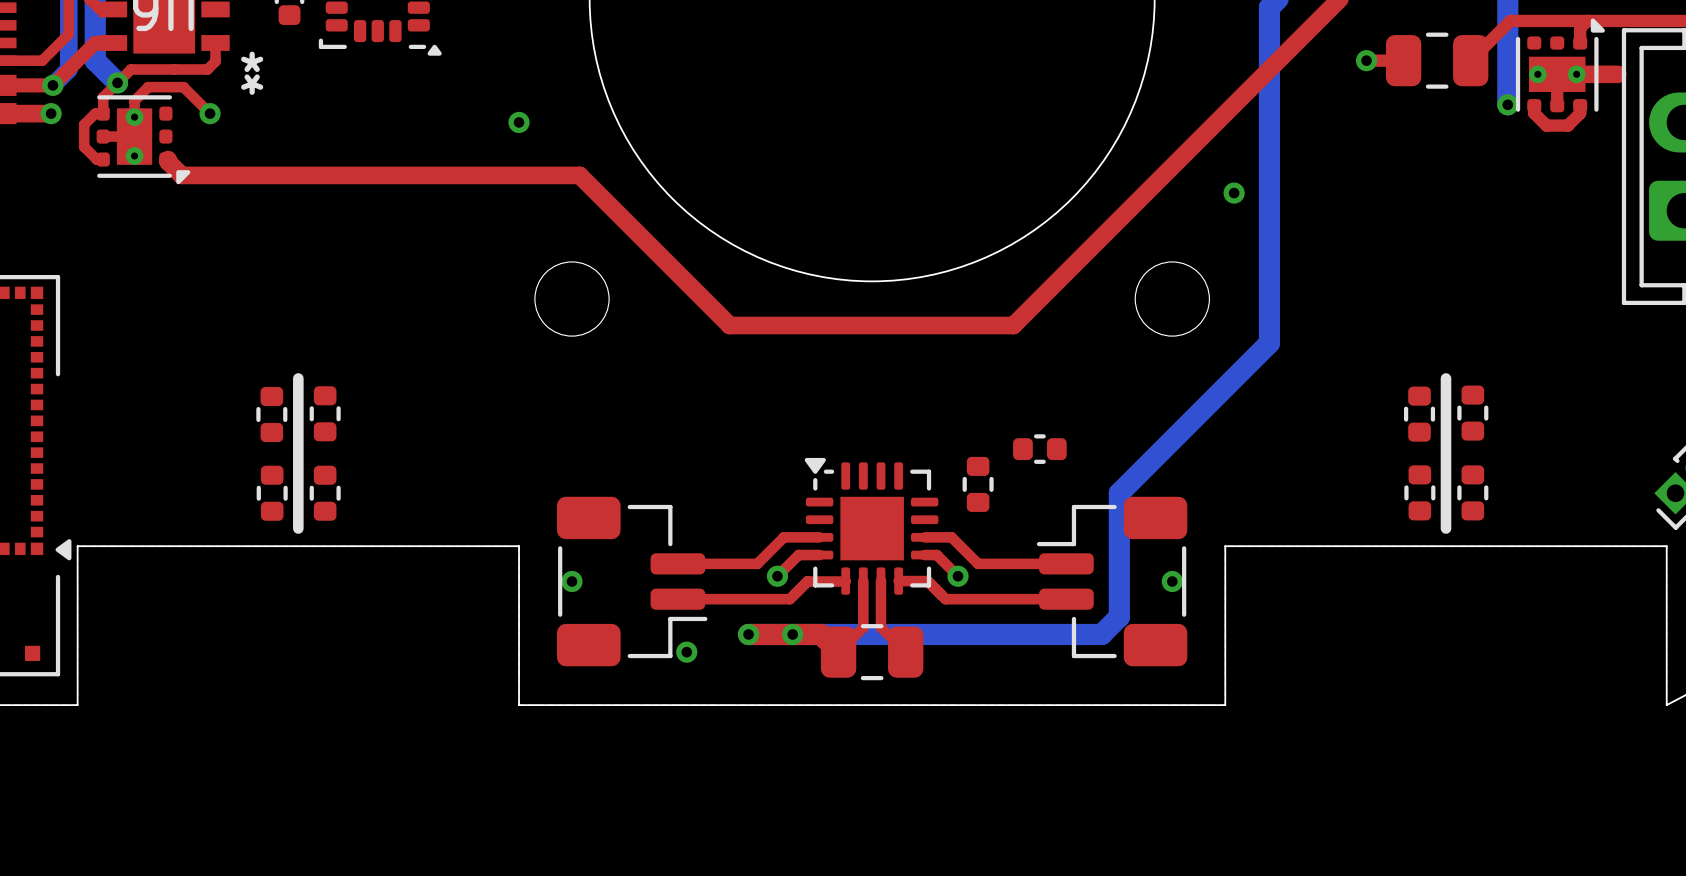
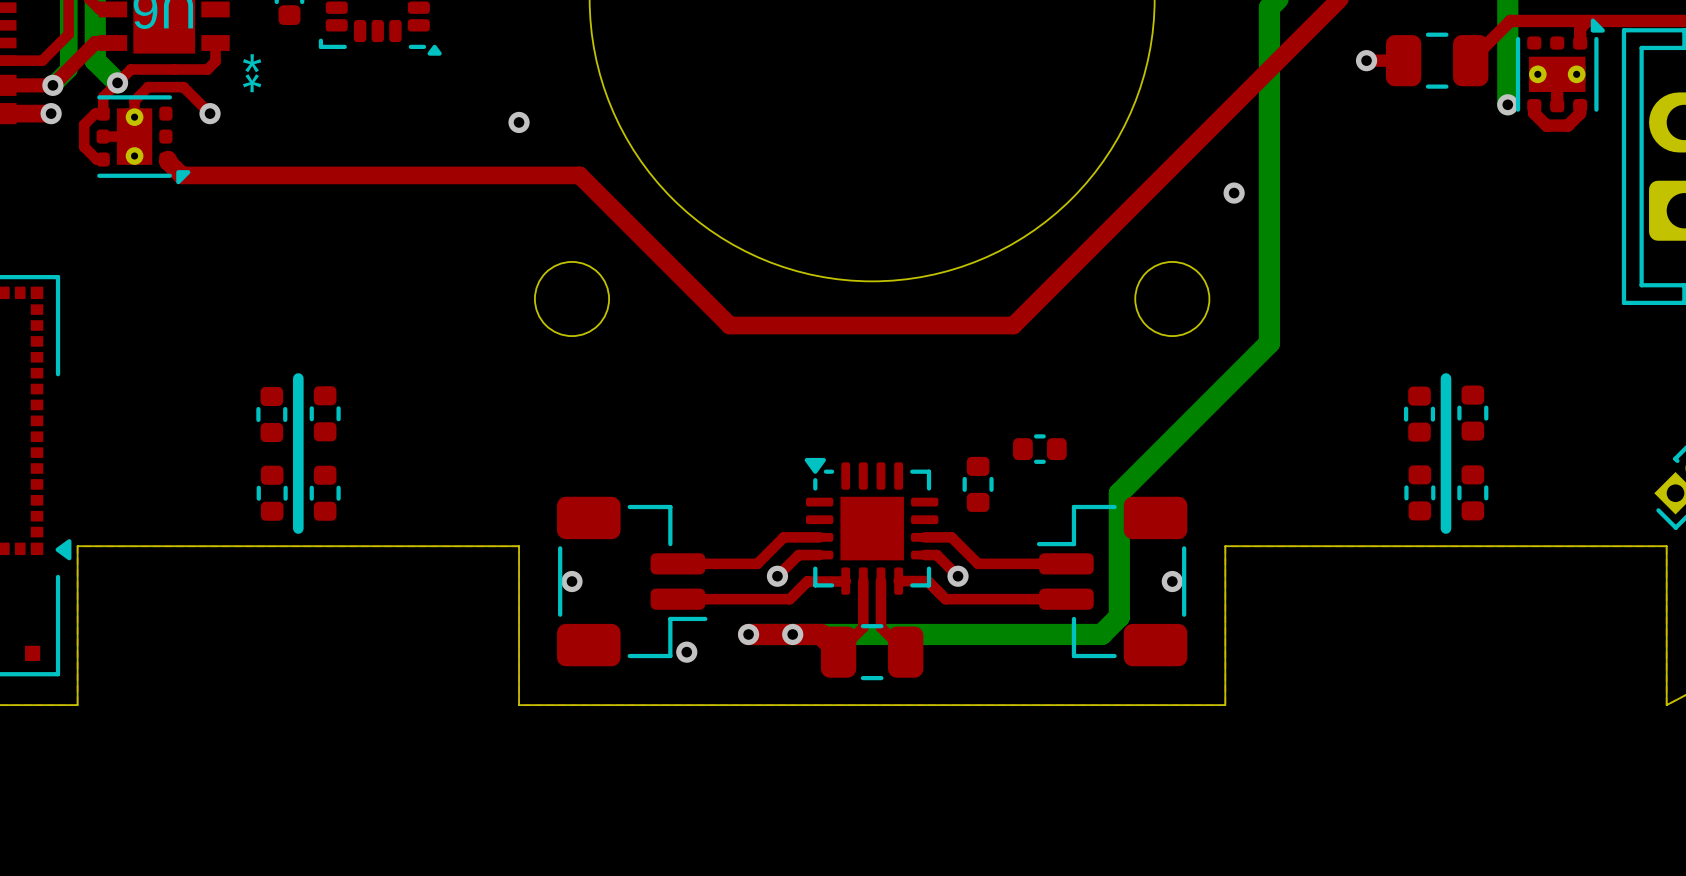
top track: (1576, 74) (1617, 74) -> none

